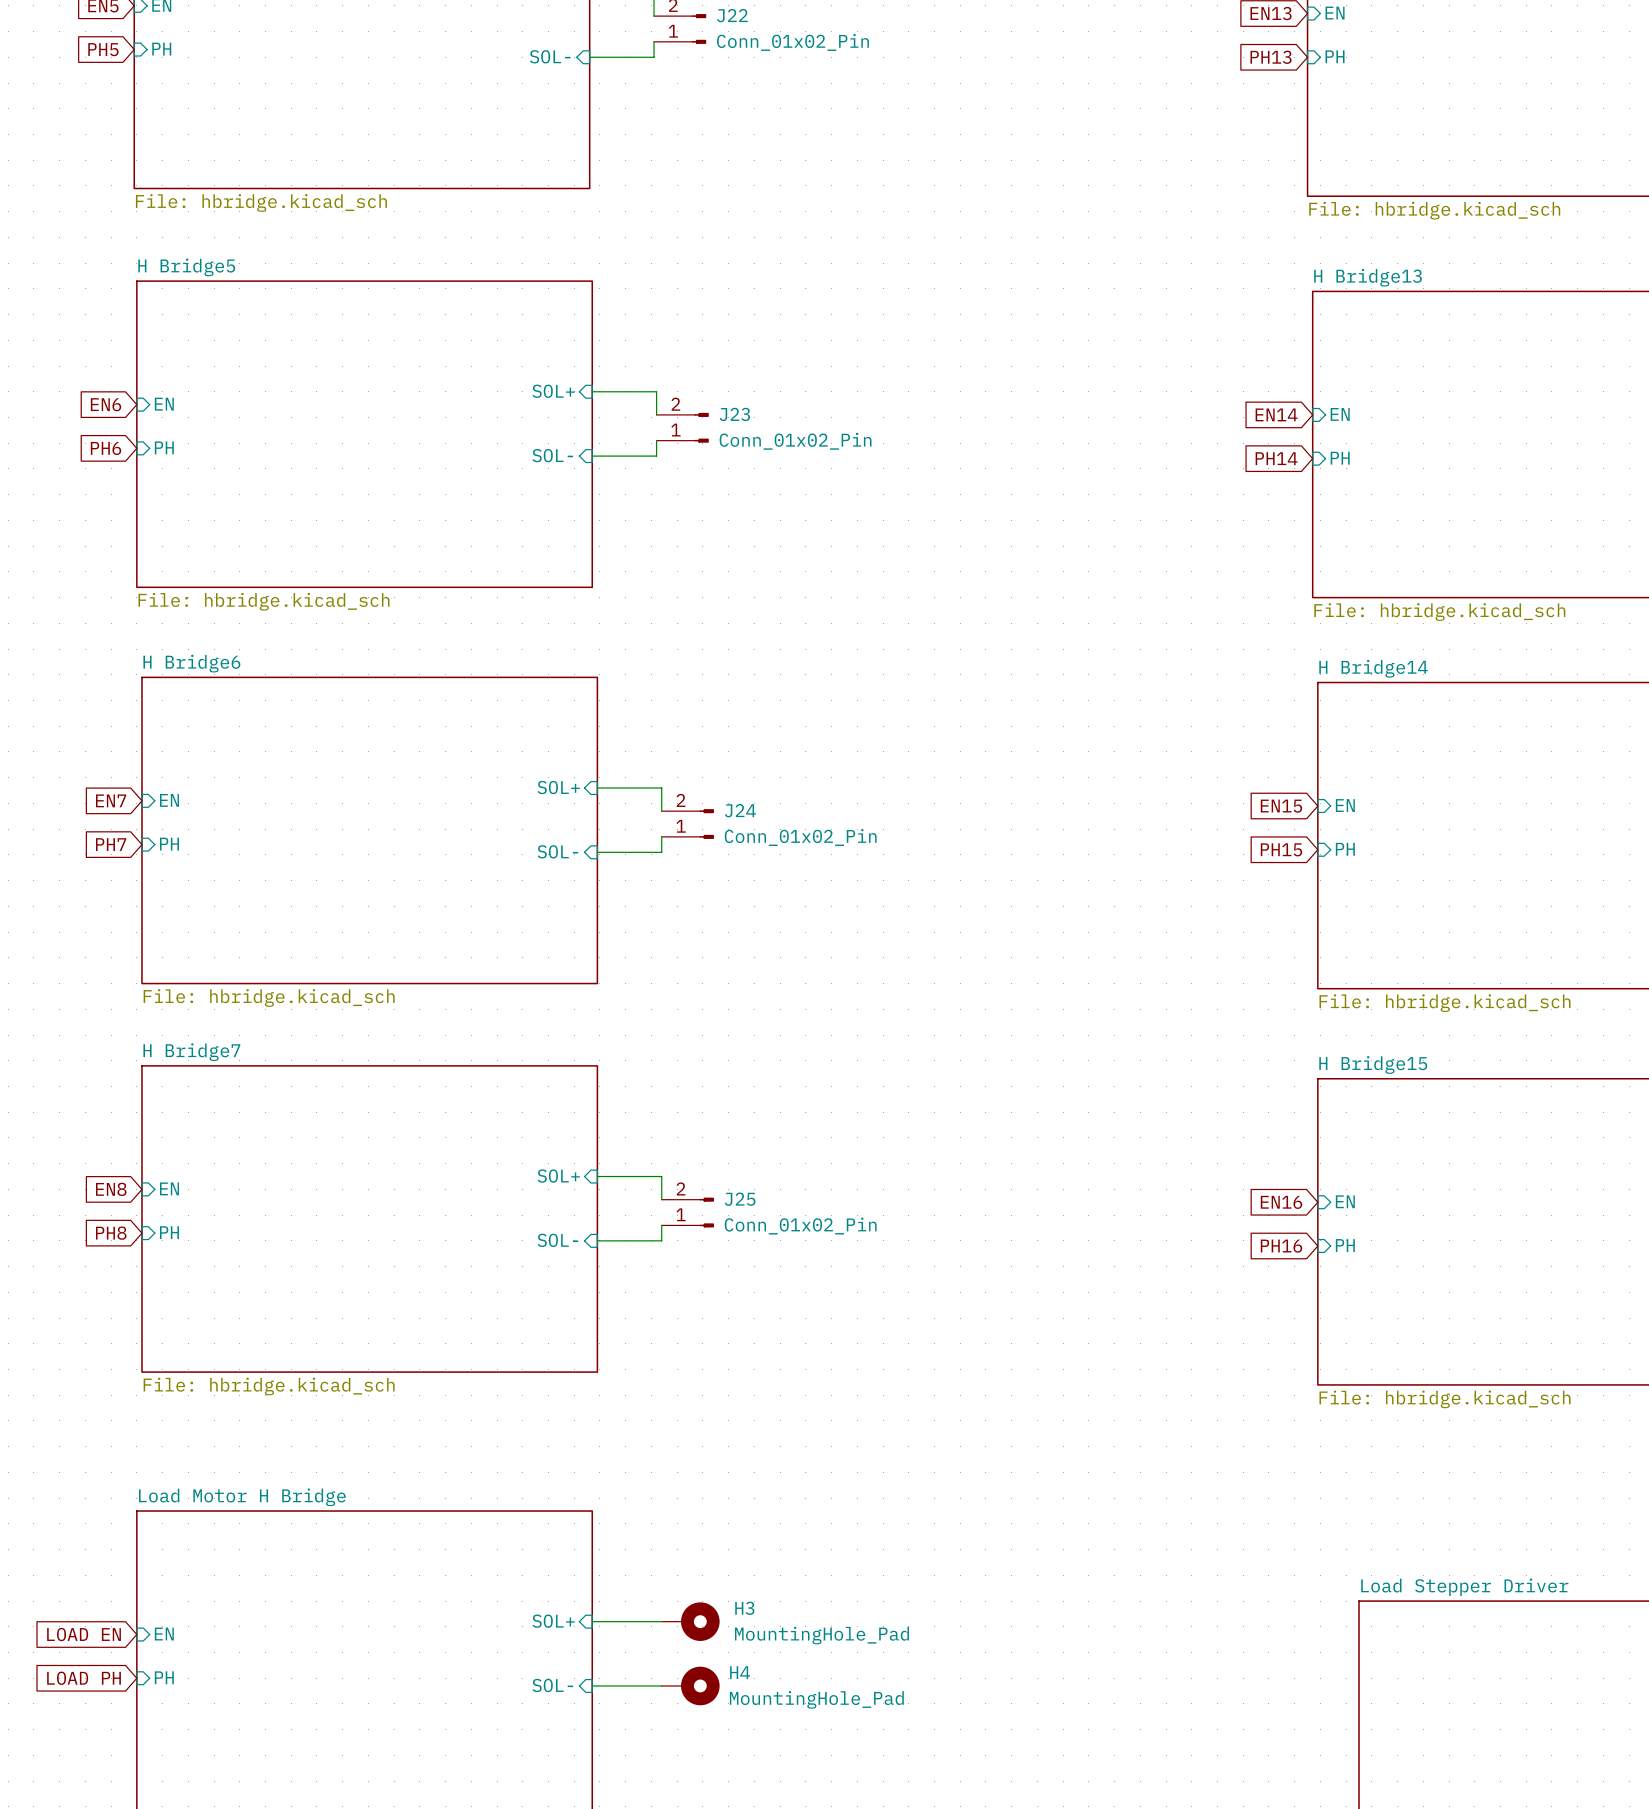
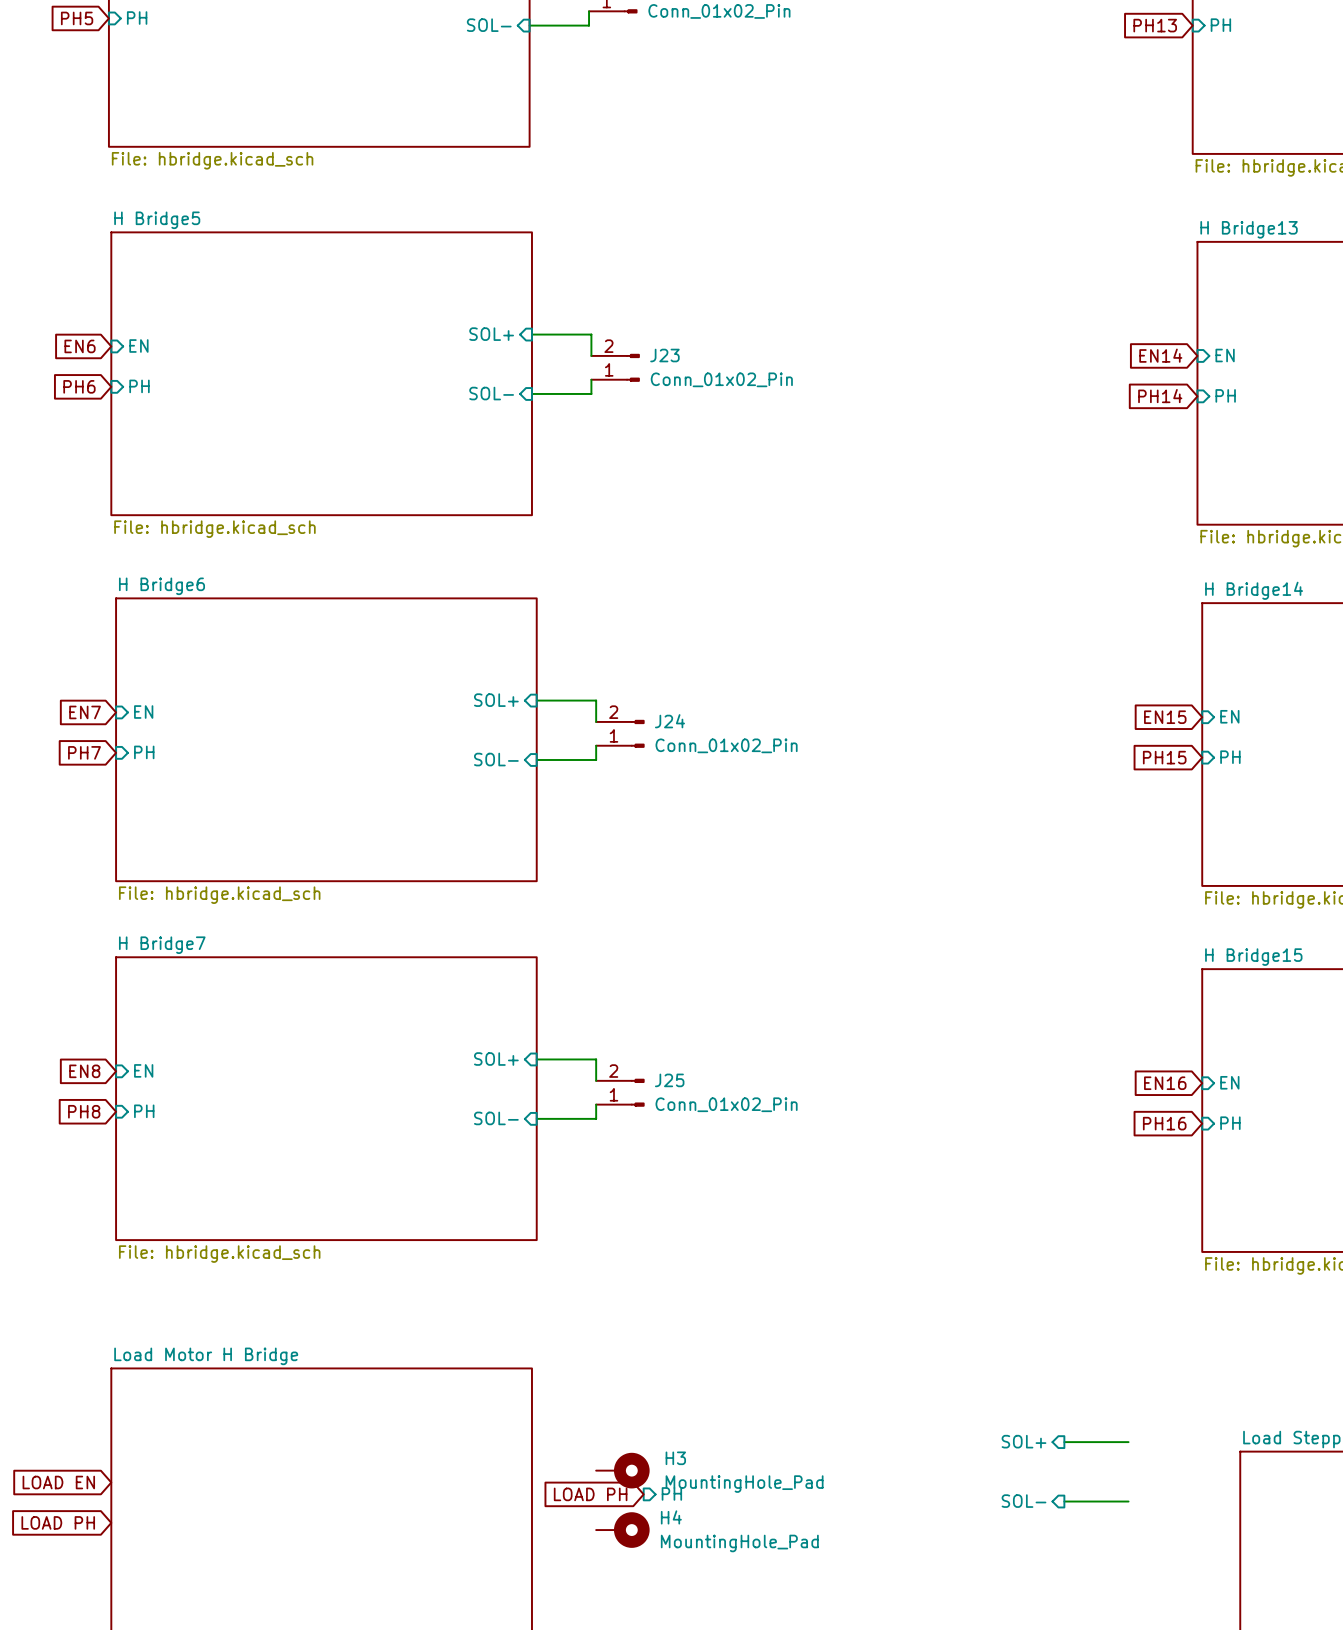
sheet pin: none -> SOL+ (1024, 1441)
wire: none -> (1064, 1442) (1128, 1442)
sheet pin: SOL+ (553, 1621) -> none
wire: (592, 1621) (661, 1621) -> none
sheet pin: EN (164, 1634) -> none
sheet pin: none -> PH (671, 1493)
global label: none -> LOAD PH (590, 1494)
sheet pin: none -> SOL- (1024, 1501)
wire: none -> (1064, 1501) (1128, 1501)
sheet pin: PH (164, 1677) -> none
sheet pin: SOL- (552, 1685) -> none
wire: (592, 1685) (661, 1685) -> none

